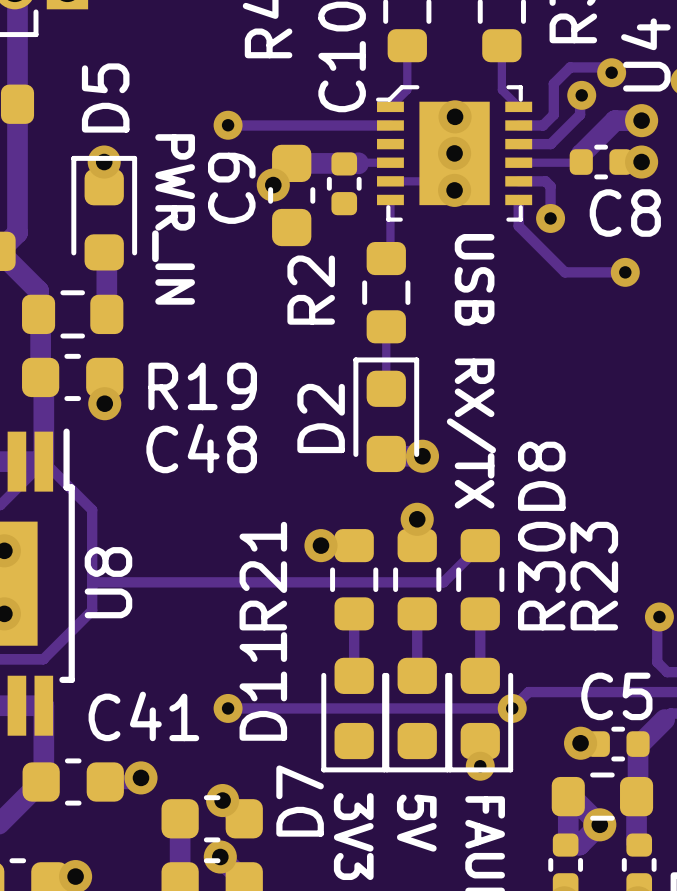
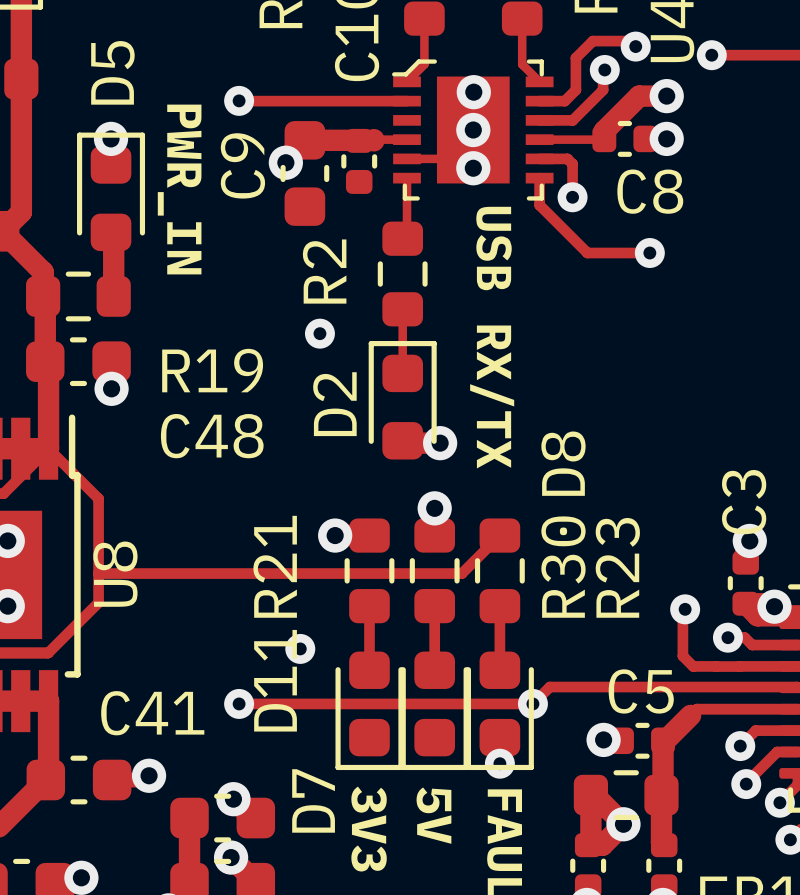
via: none -> (319, 333)
via: none -> (300, 648)

